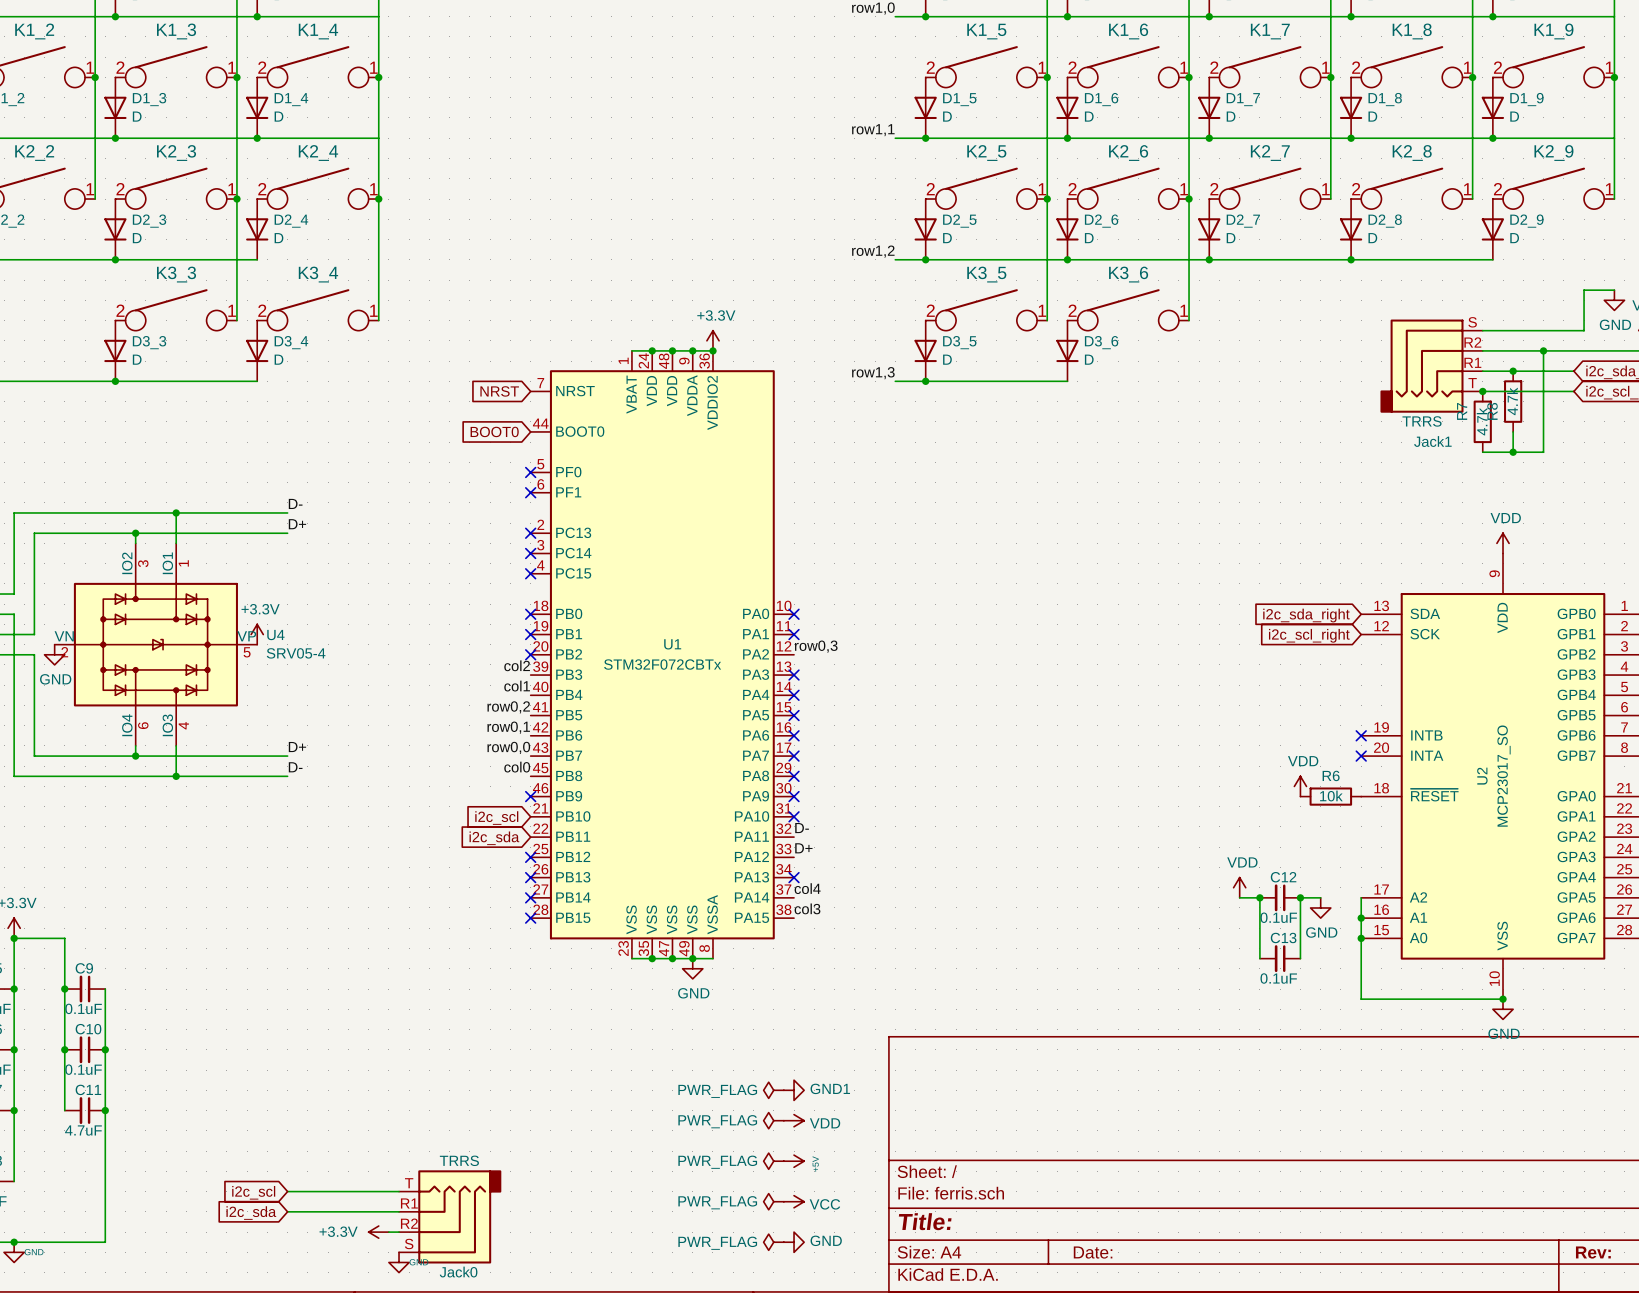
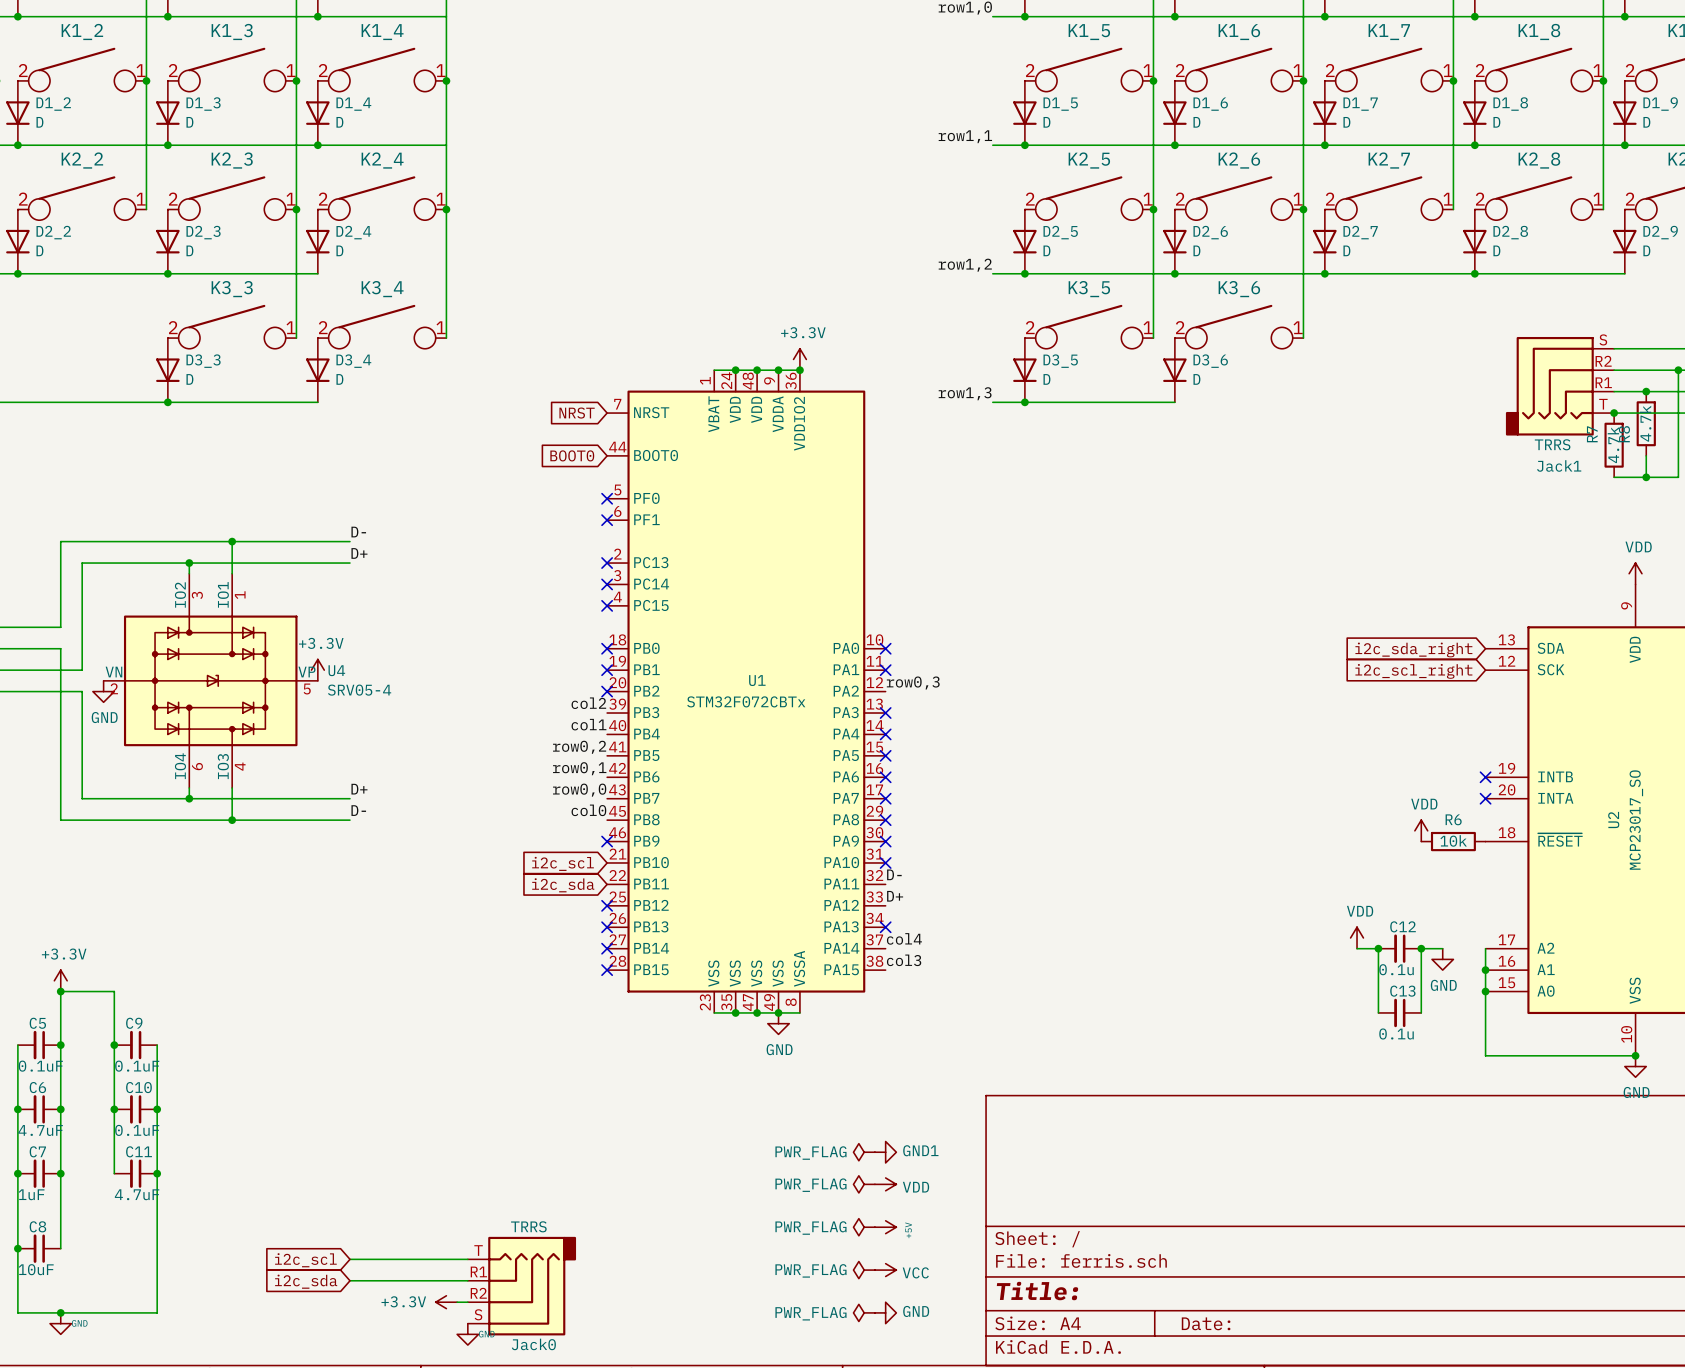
C12 value: 0.1uF (1278, 917) -> 0.1u (1396, 969)
C13 value: 0.1uF (1278, 978) -> 0.1u (1396, 1033)

